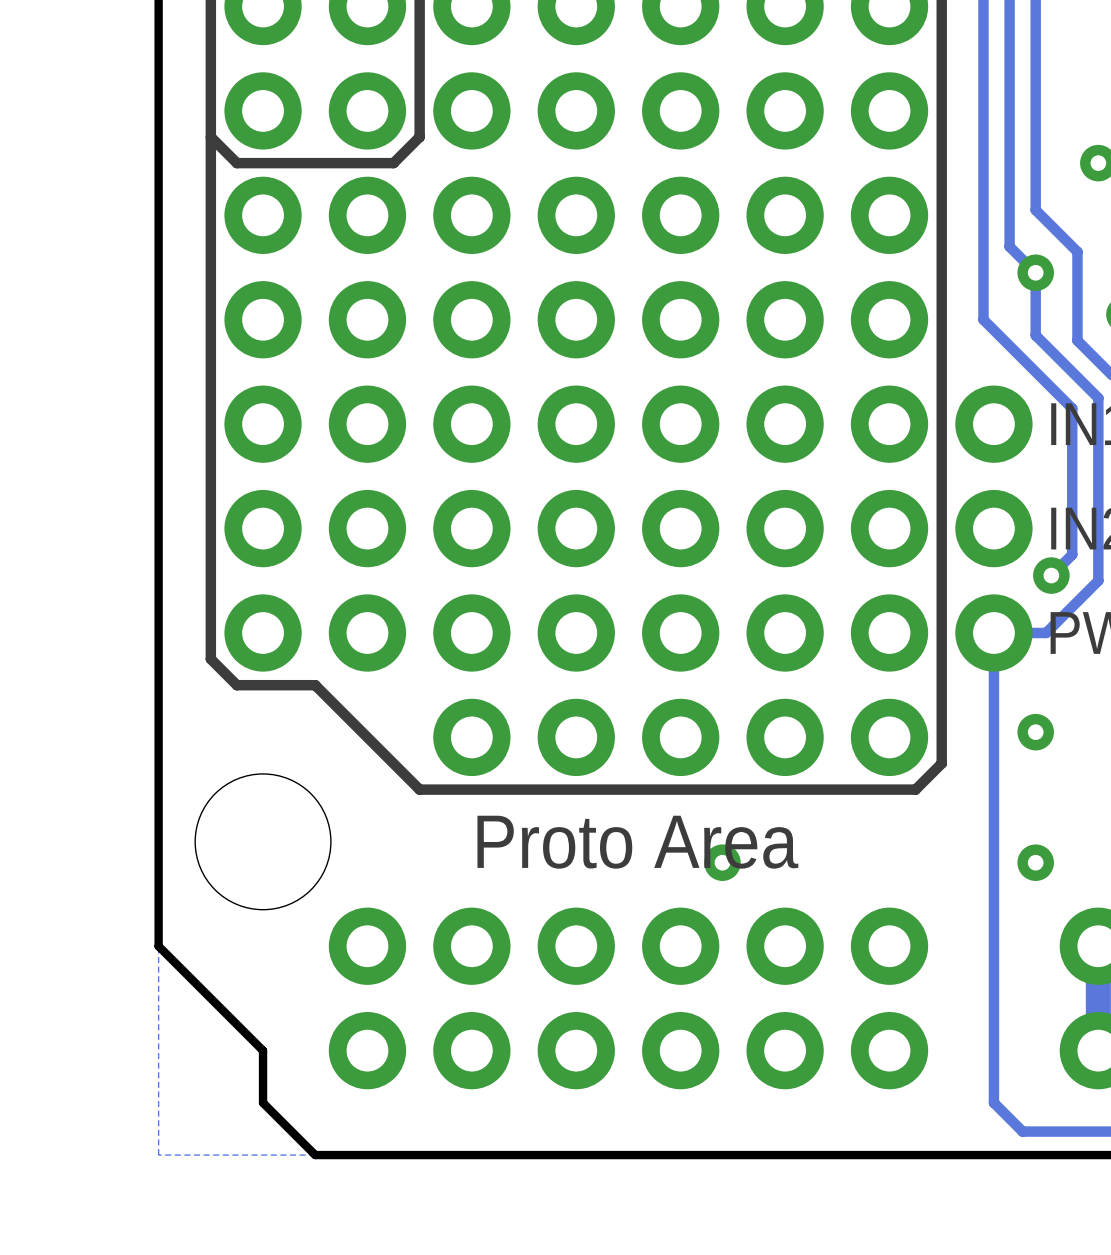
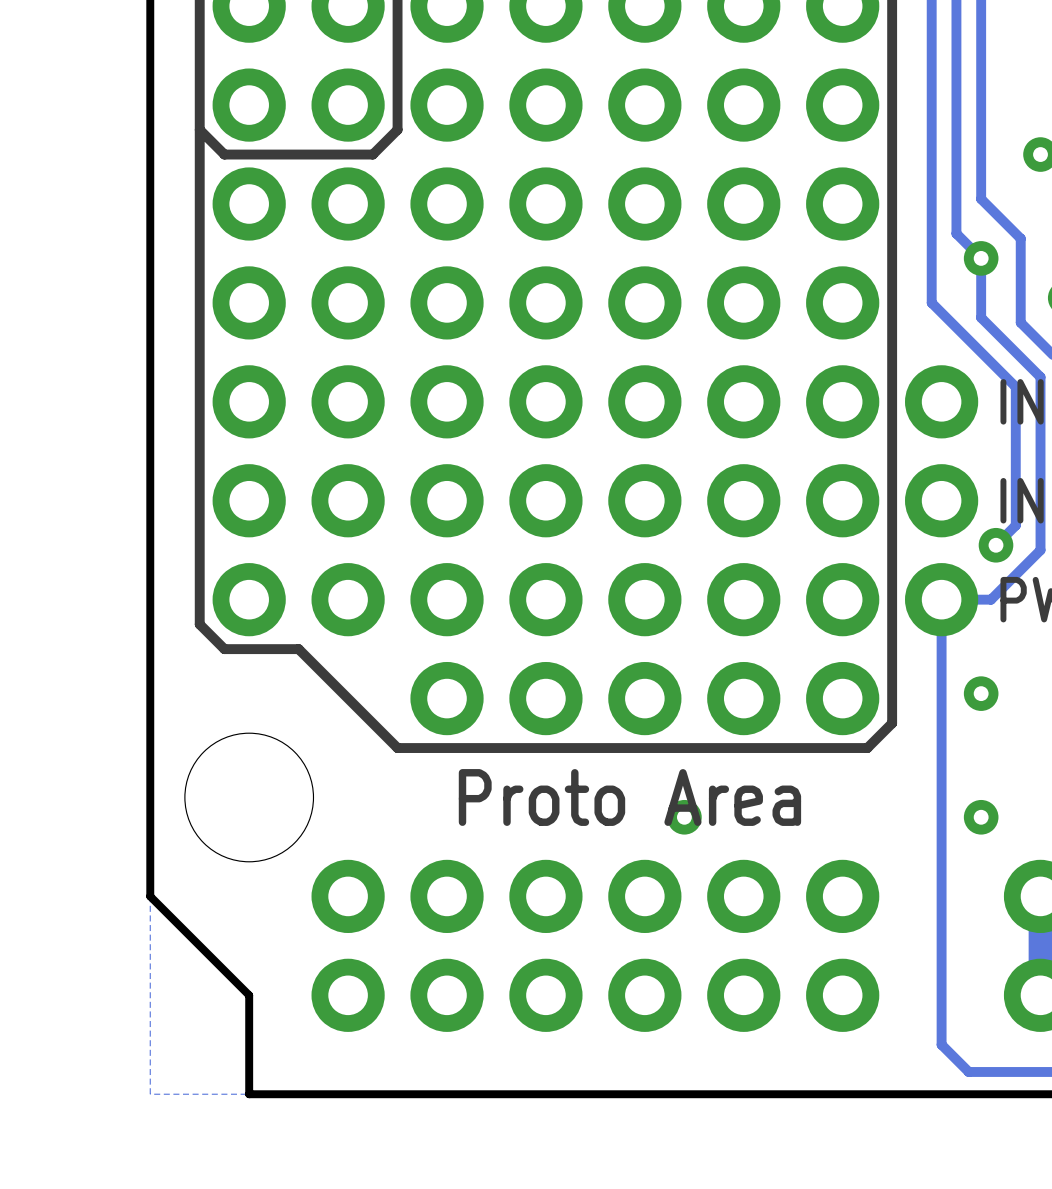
board edge: (263, 1102) (315, 1155) -> (249, 1044) (249, 1094) (298, 1094)

